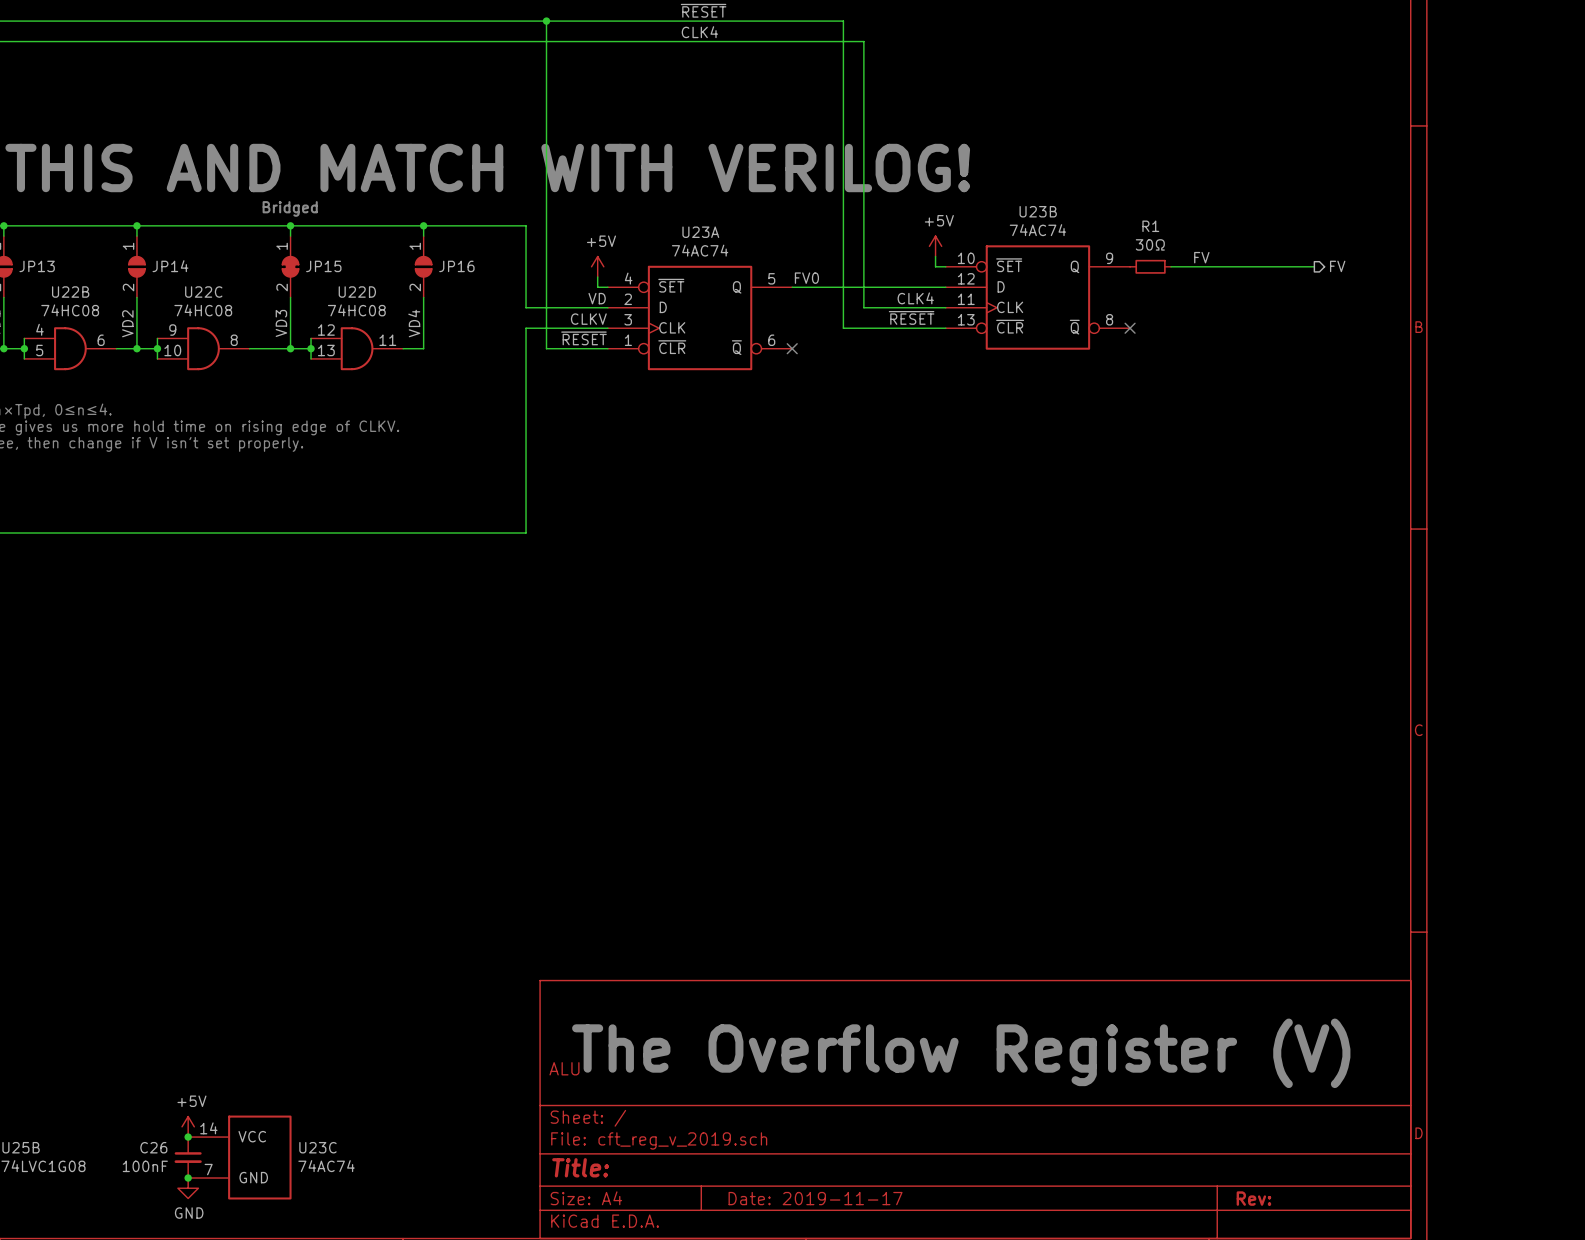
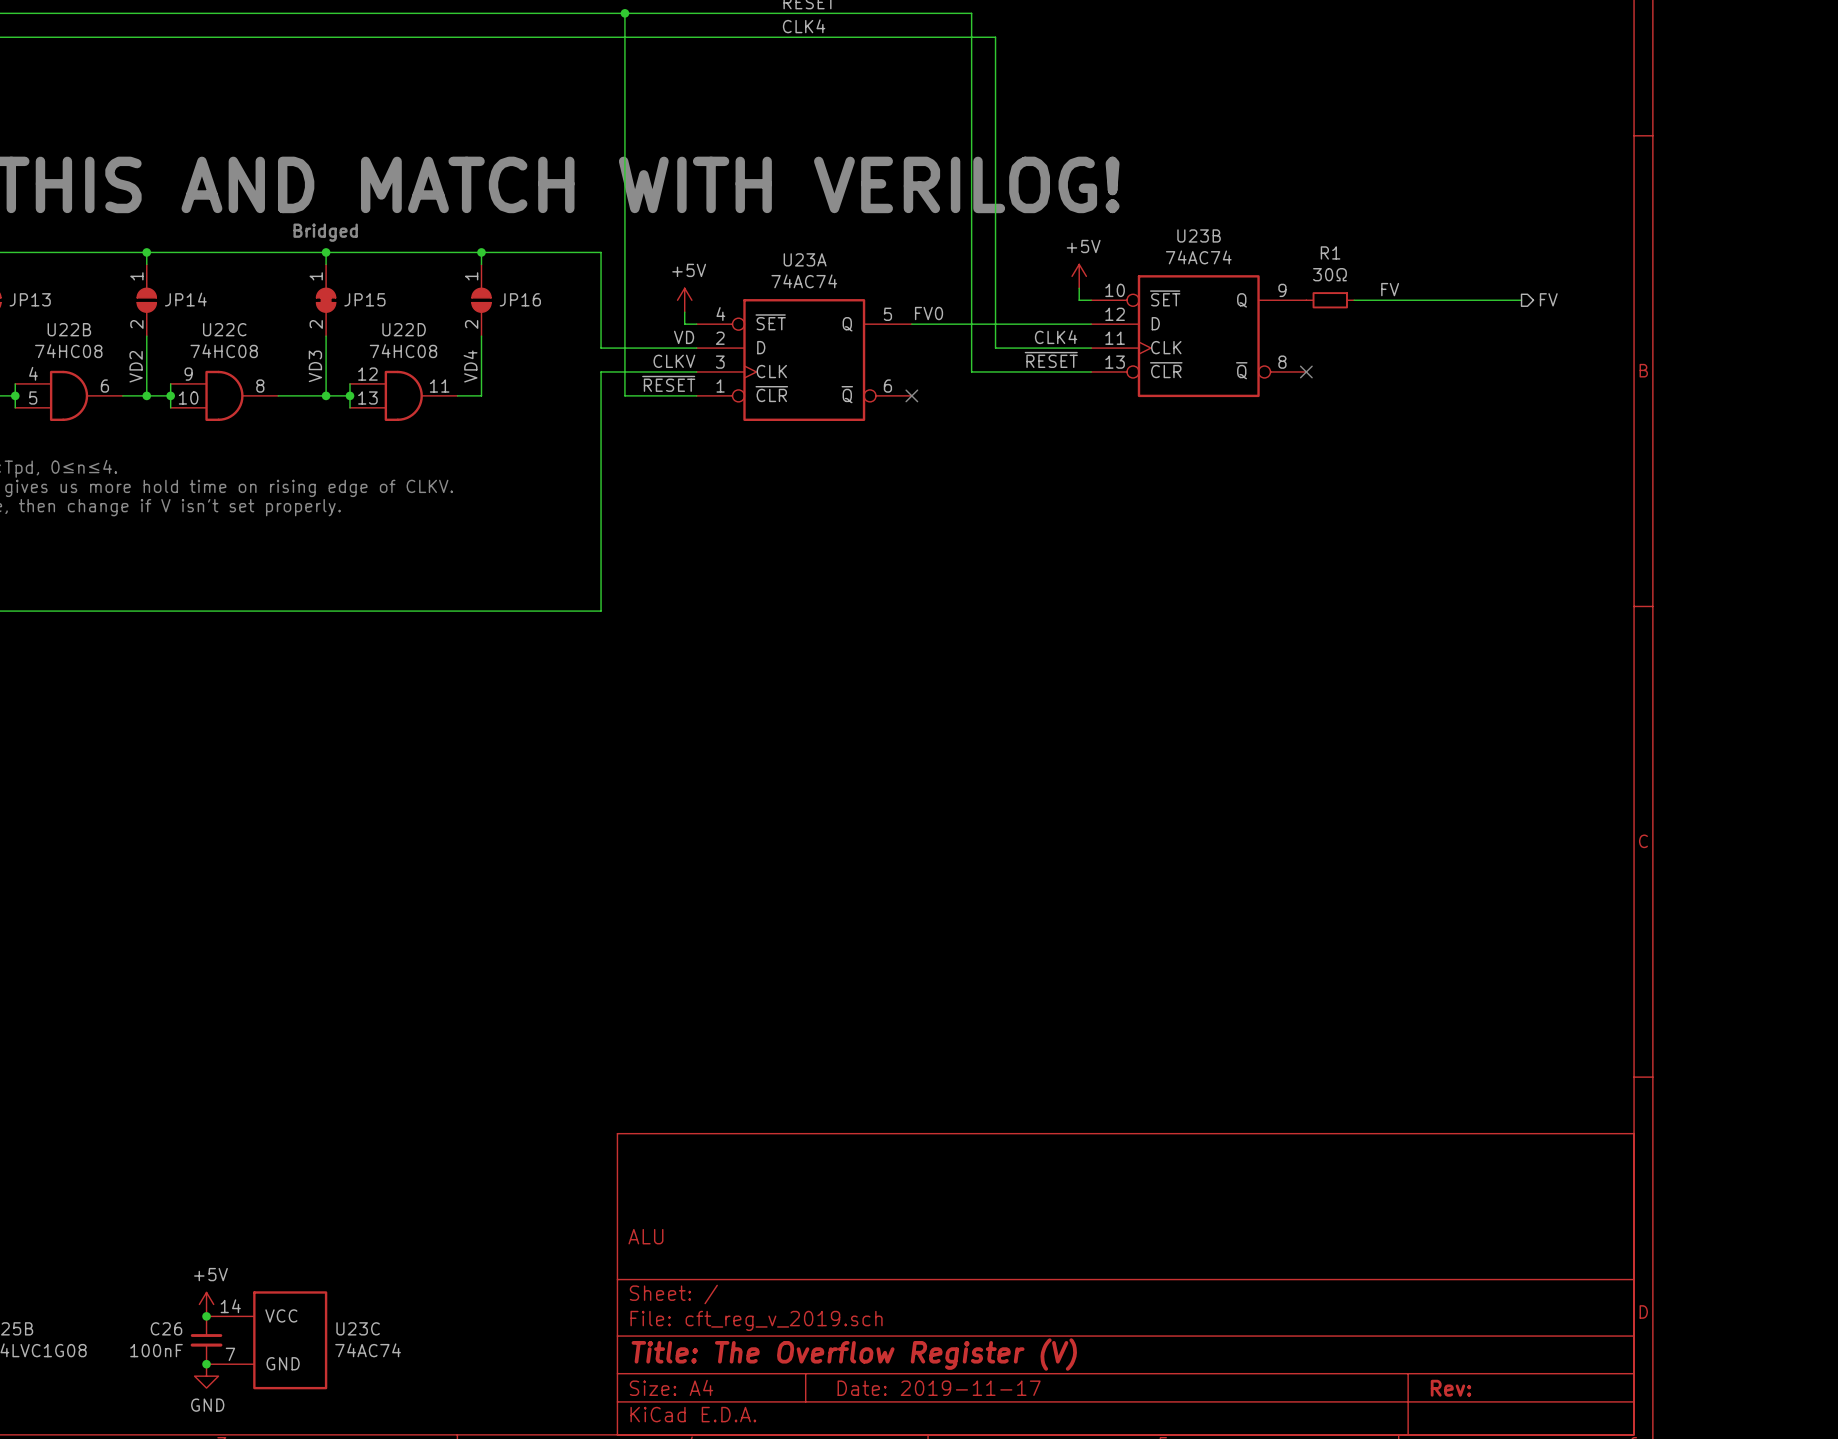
text: The Overflow Register (V) (961, 1053) -> none
title block: Title: (580, 1167) -> Title: The Overflow Register (V) (854, 1354)

